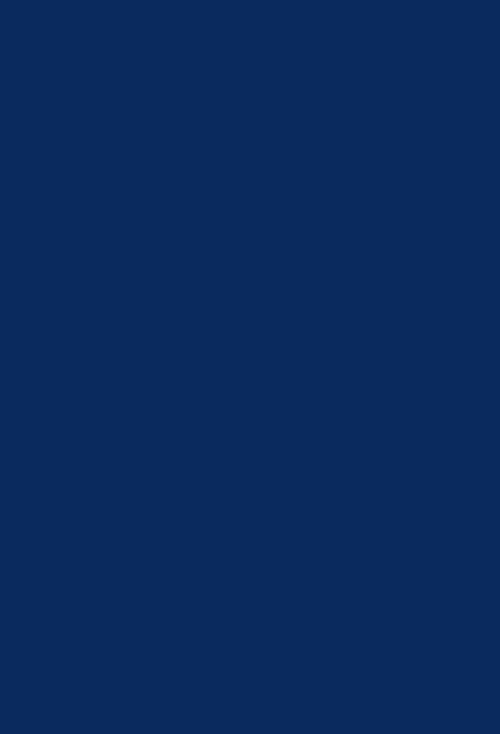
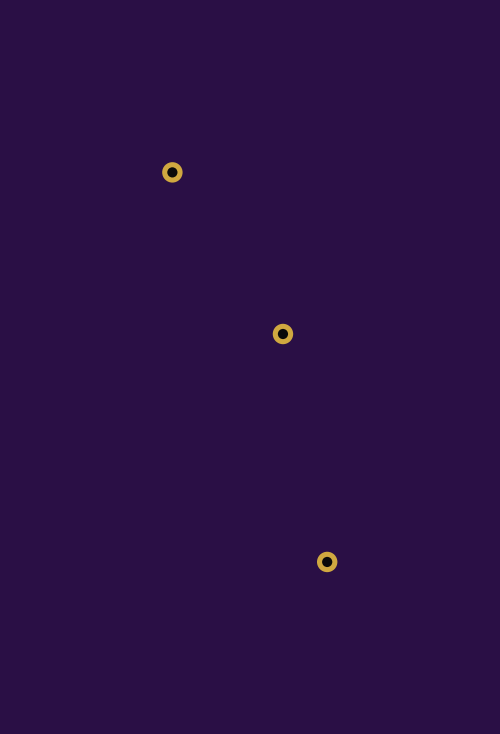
via: none -> (172, 172)
via: none -> (282, 333)
via: none -> (327, 561)

